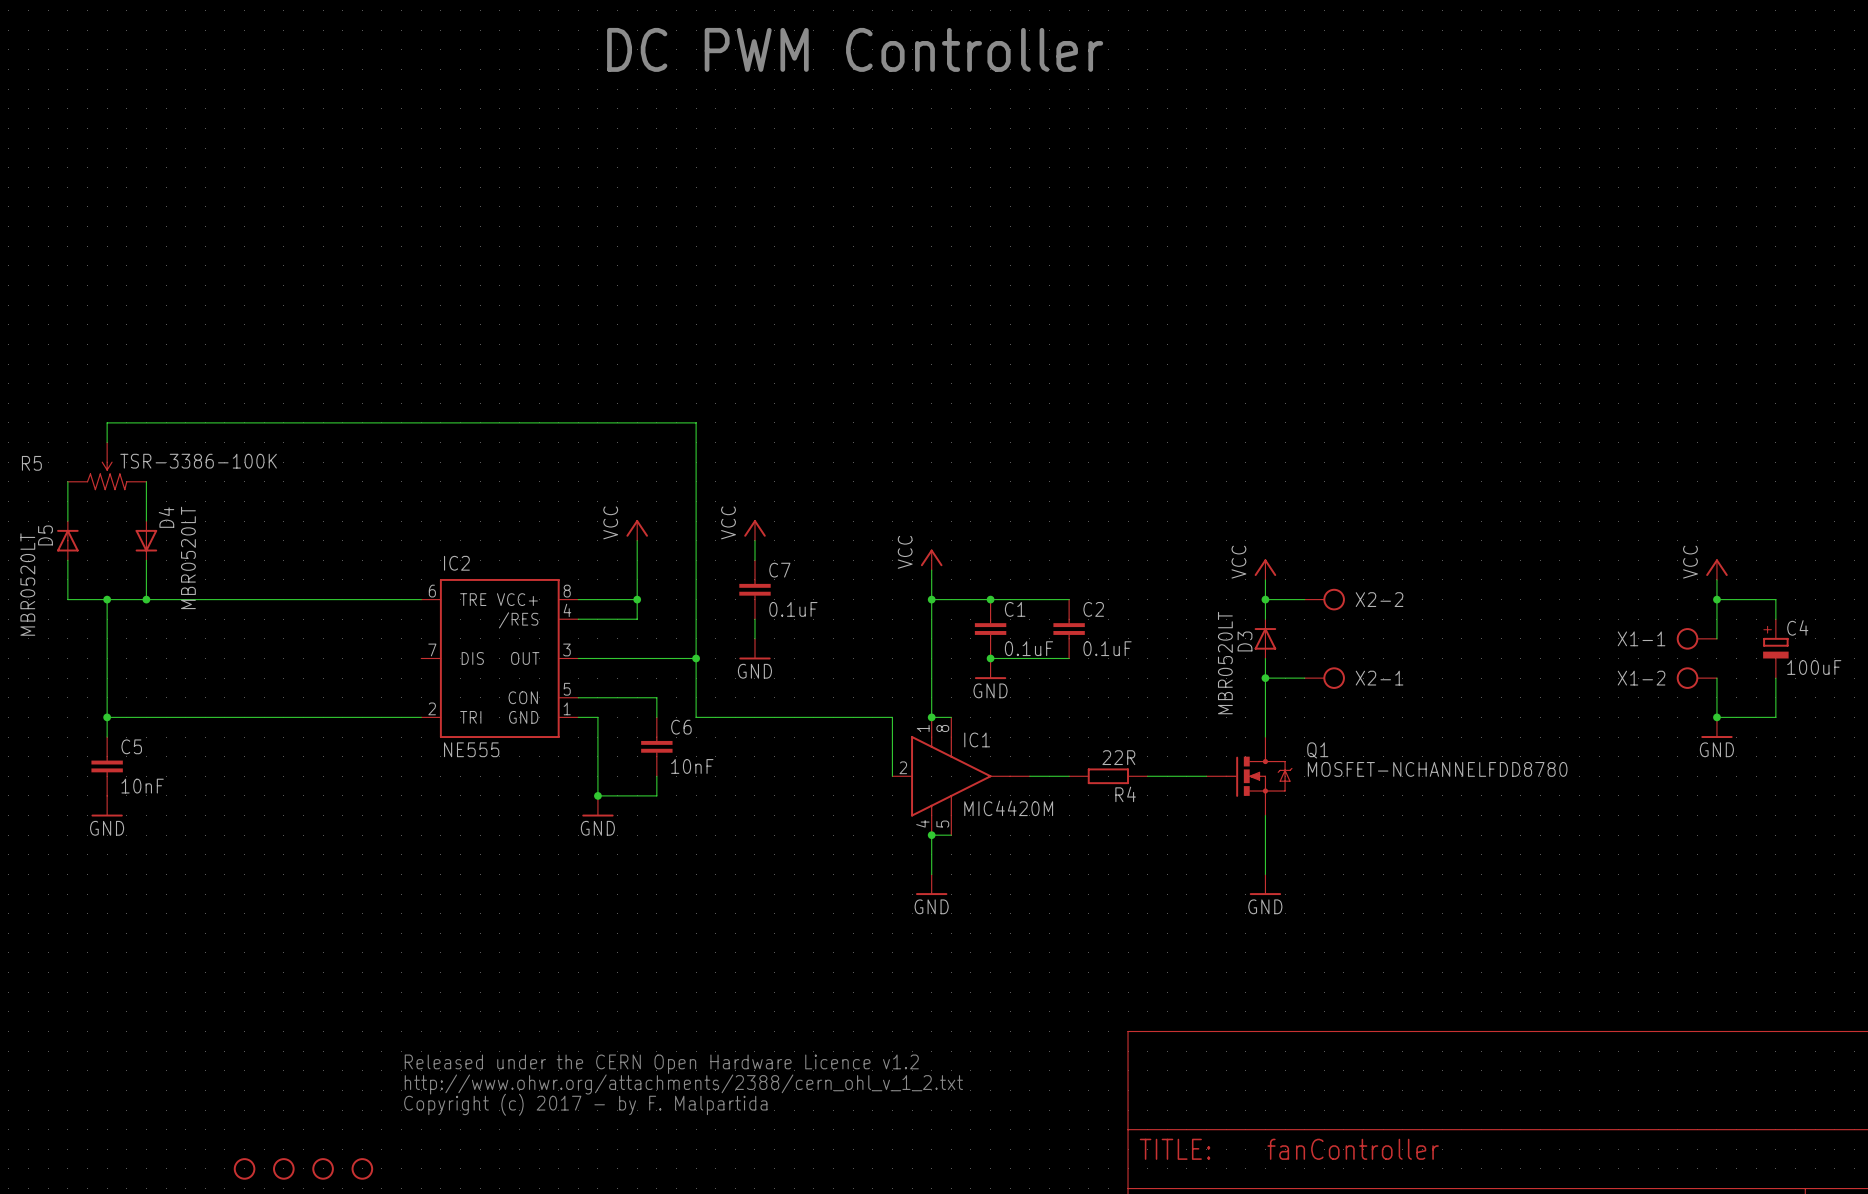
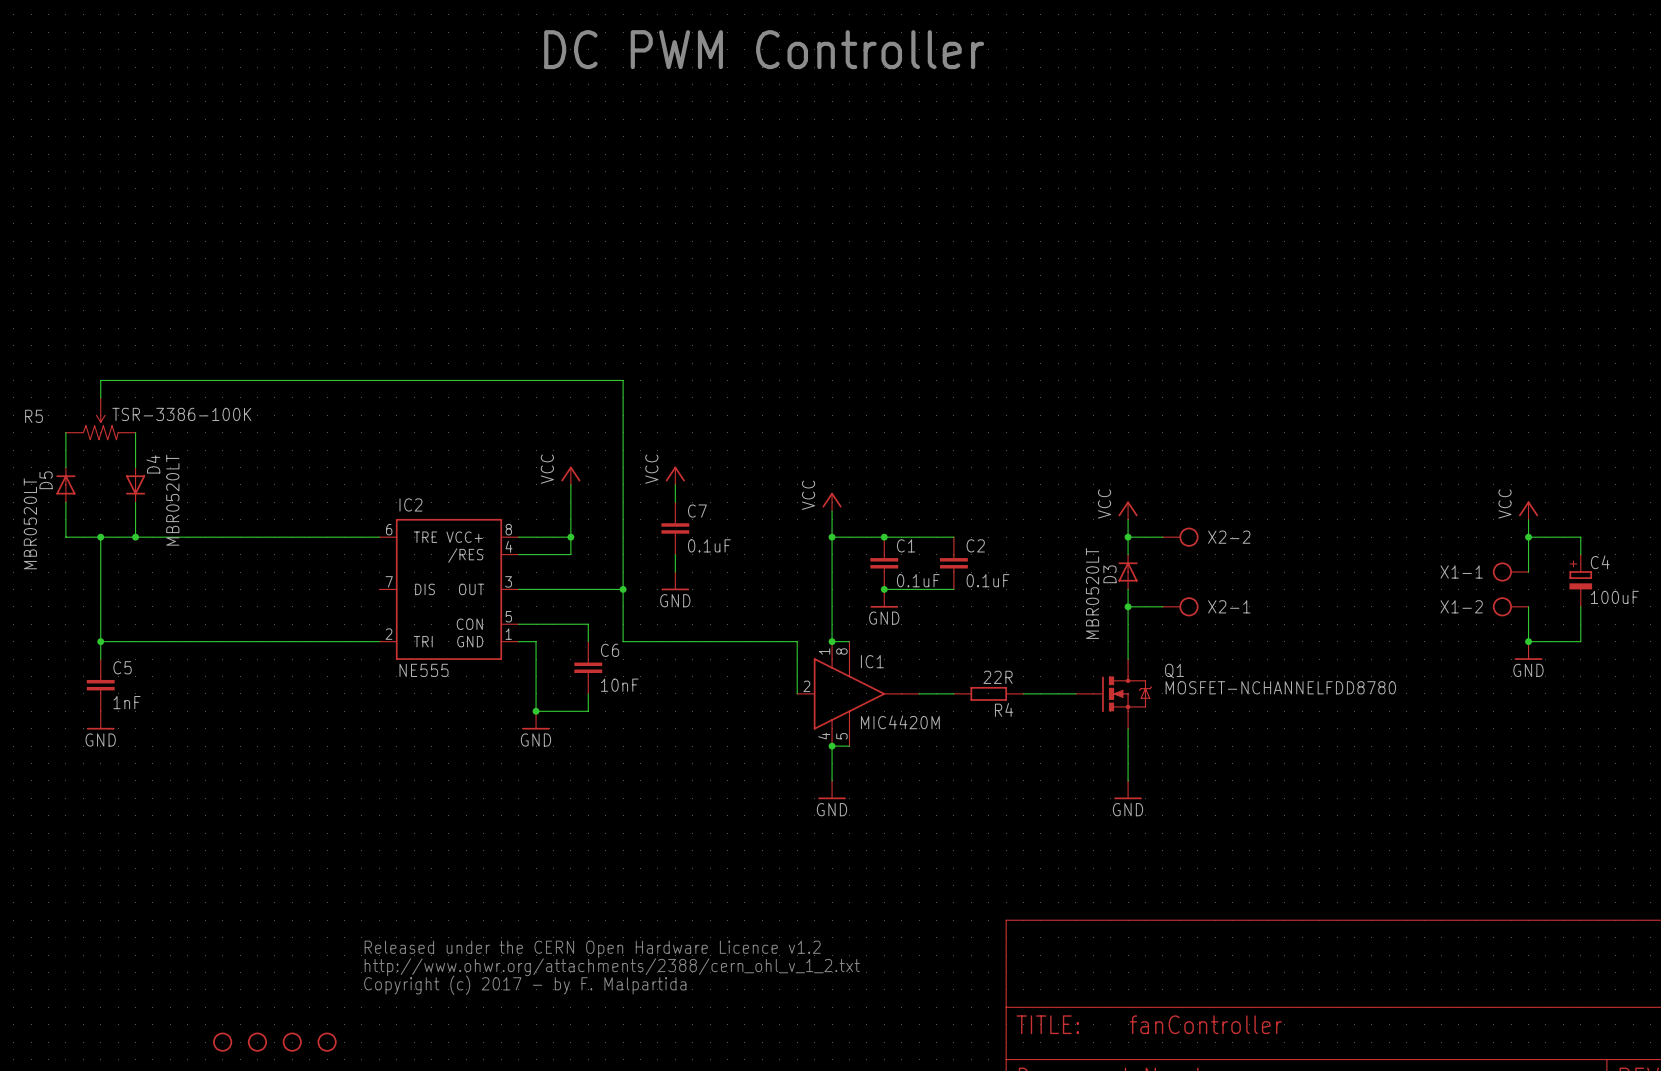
C5 value: 10nF (142, 786) -> 1nF (126, 702)

